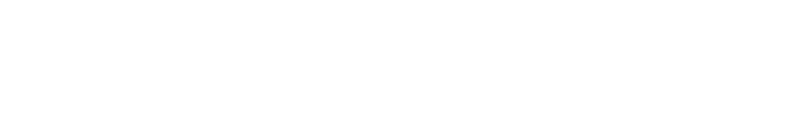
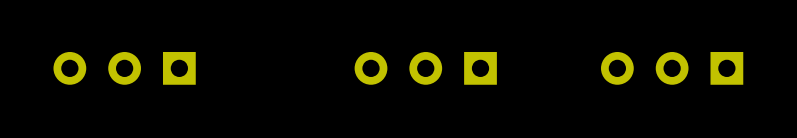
part: none -> (124, 68)
part: none -> (425, 68)
part: none -> (672, 68)

